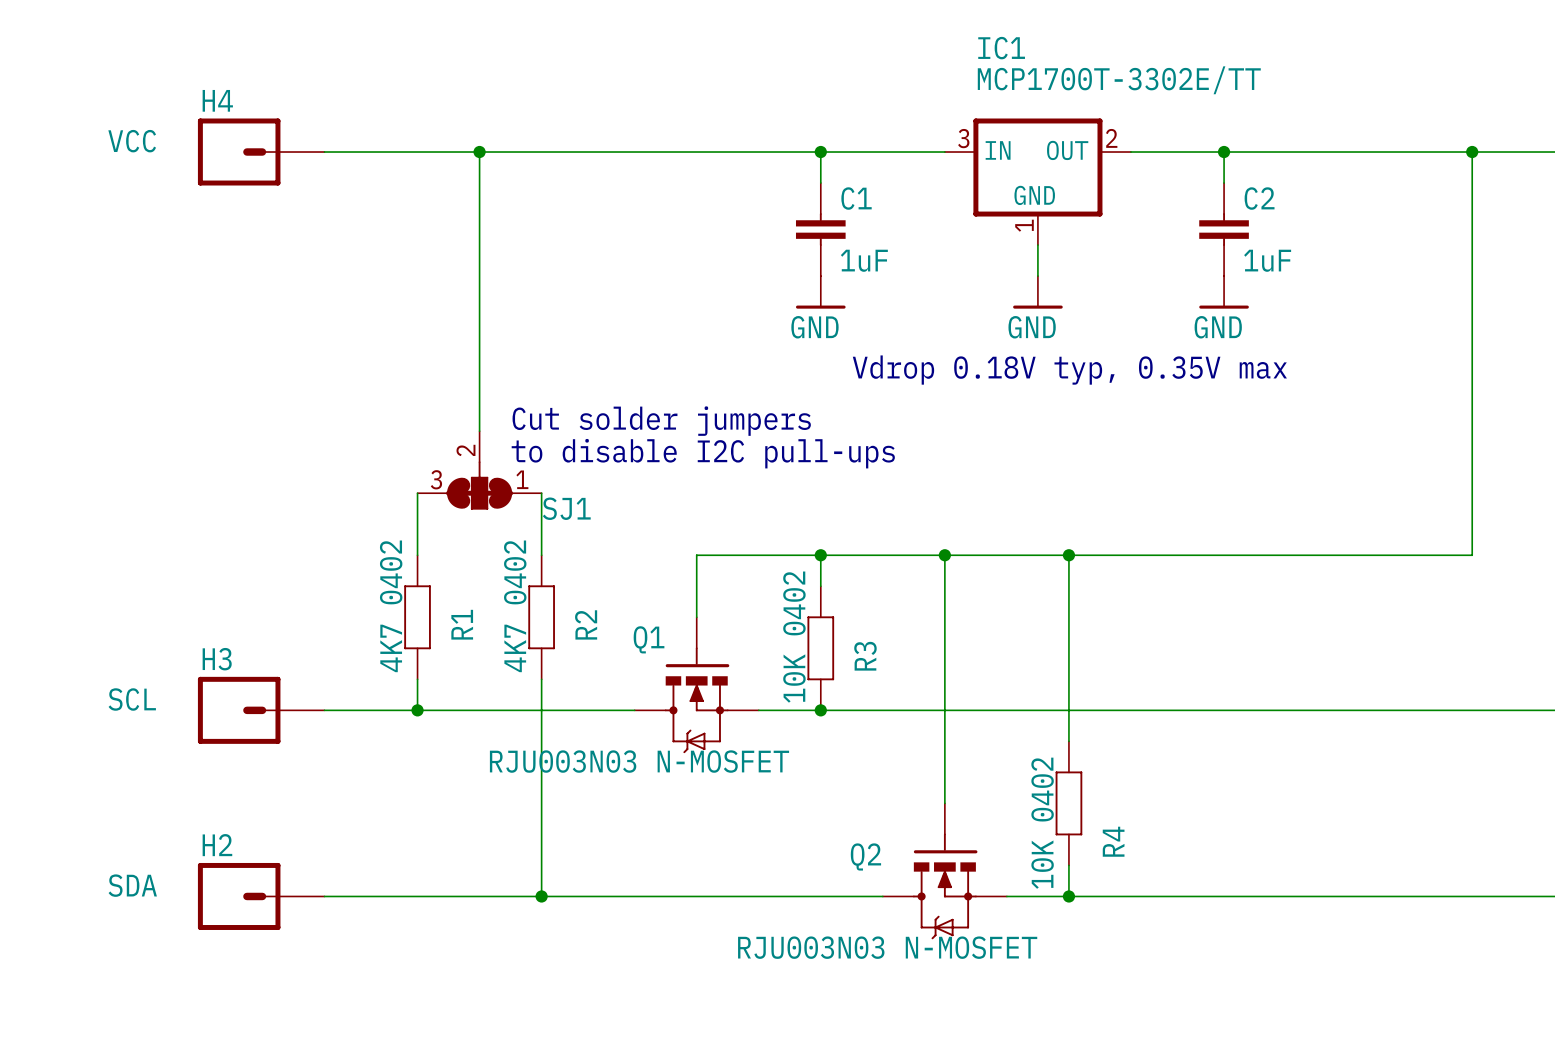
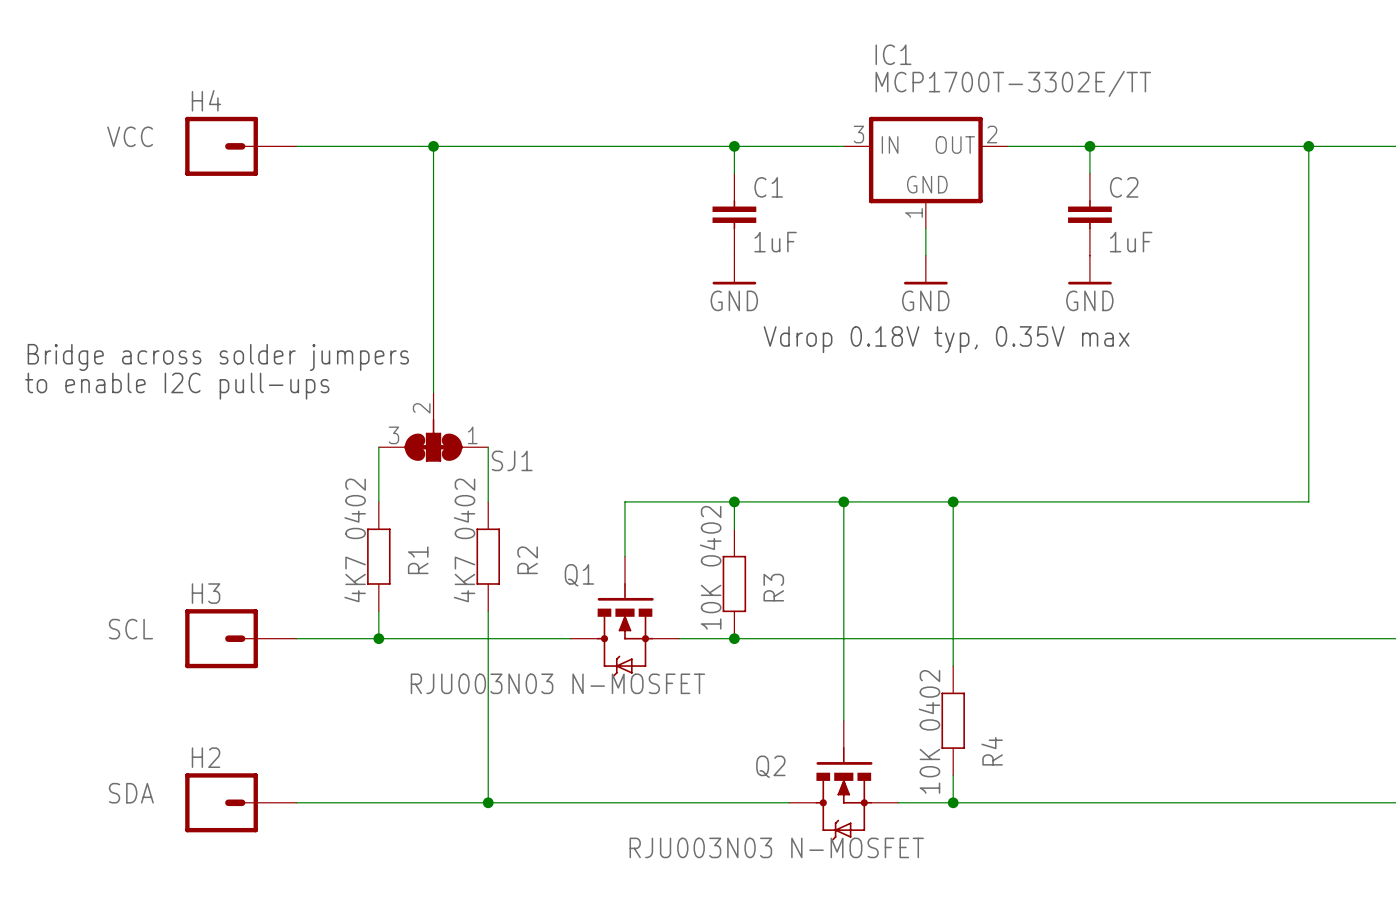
text: none -> Bridge across solder jumpers (218, 357)
text: Cut solder jumpers (661, 421) -> none
text: none -> to enable I2C pull-ups (177, 386)
text: to disable I2C pull-ups (703, 453) -> none

